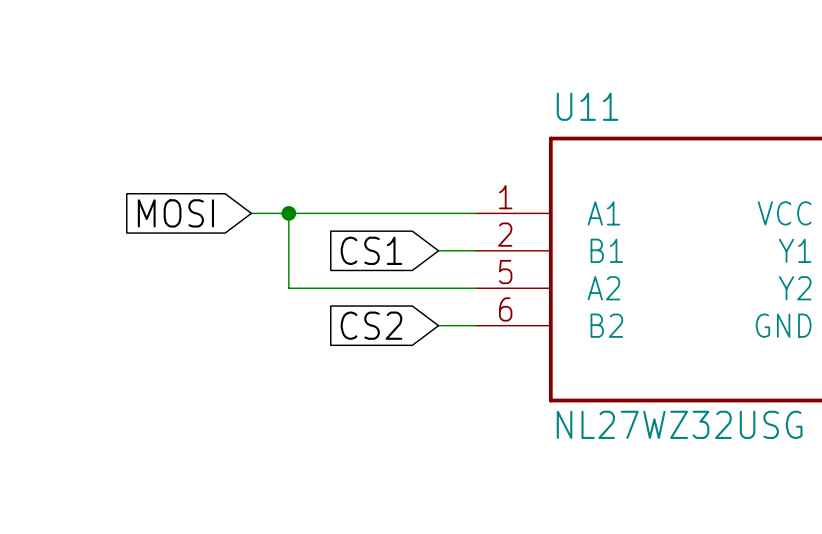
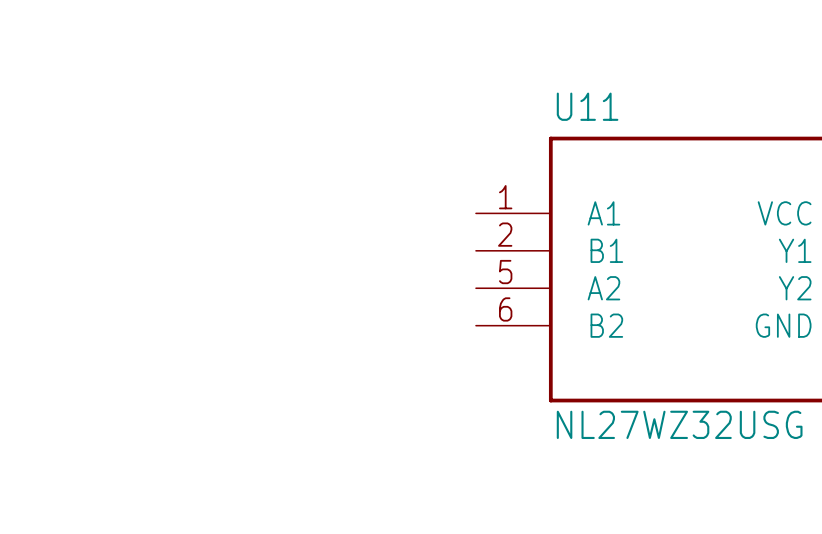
global label: MOSI (175, 213) -> none
wire: (251, 213) (475, 213) -> none
wire: (288, 213) (288, 288) (475, 288) -> none
junction: (288, 213) -> none
global label: CS1 (371, 250) -> none
wire: (438, 250) (475, 250) -> none
global label: CS2 (371, 325) -> none
wire: (438, 325) (475, 325) -> none

